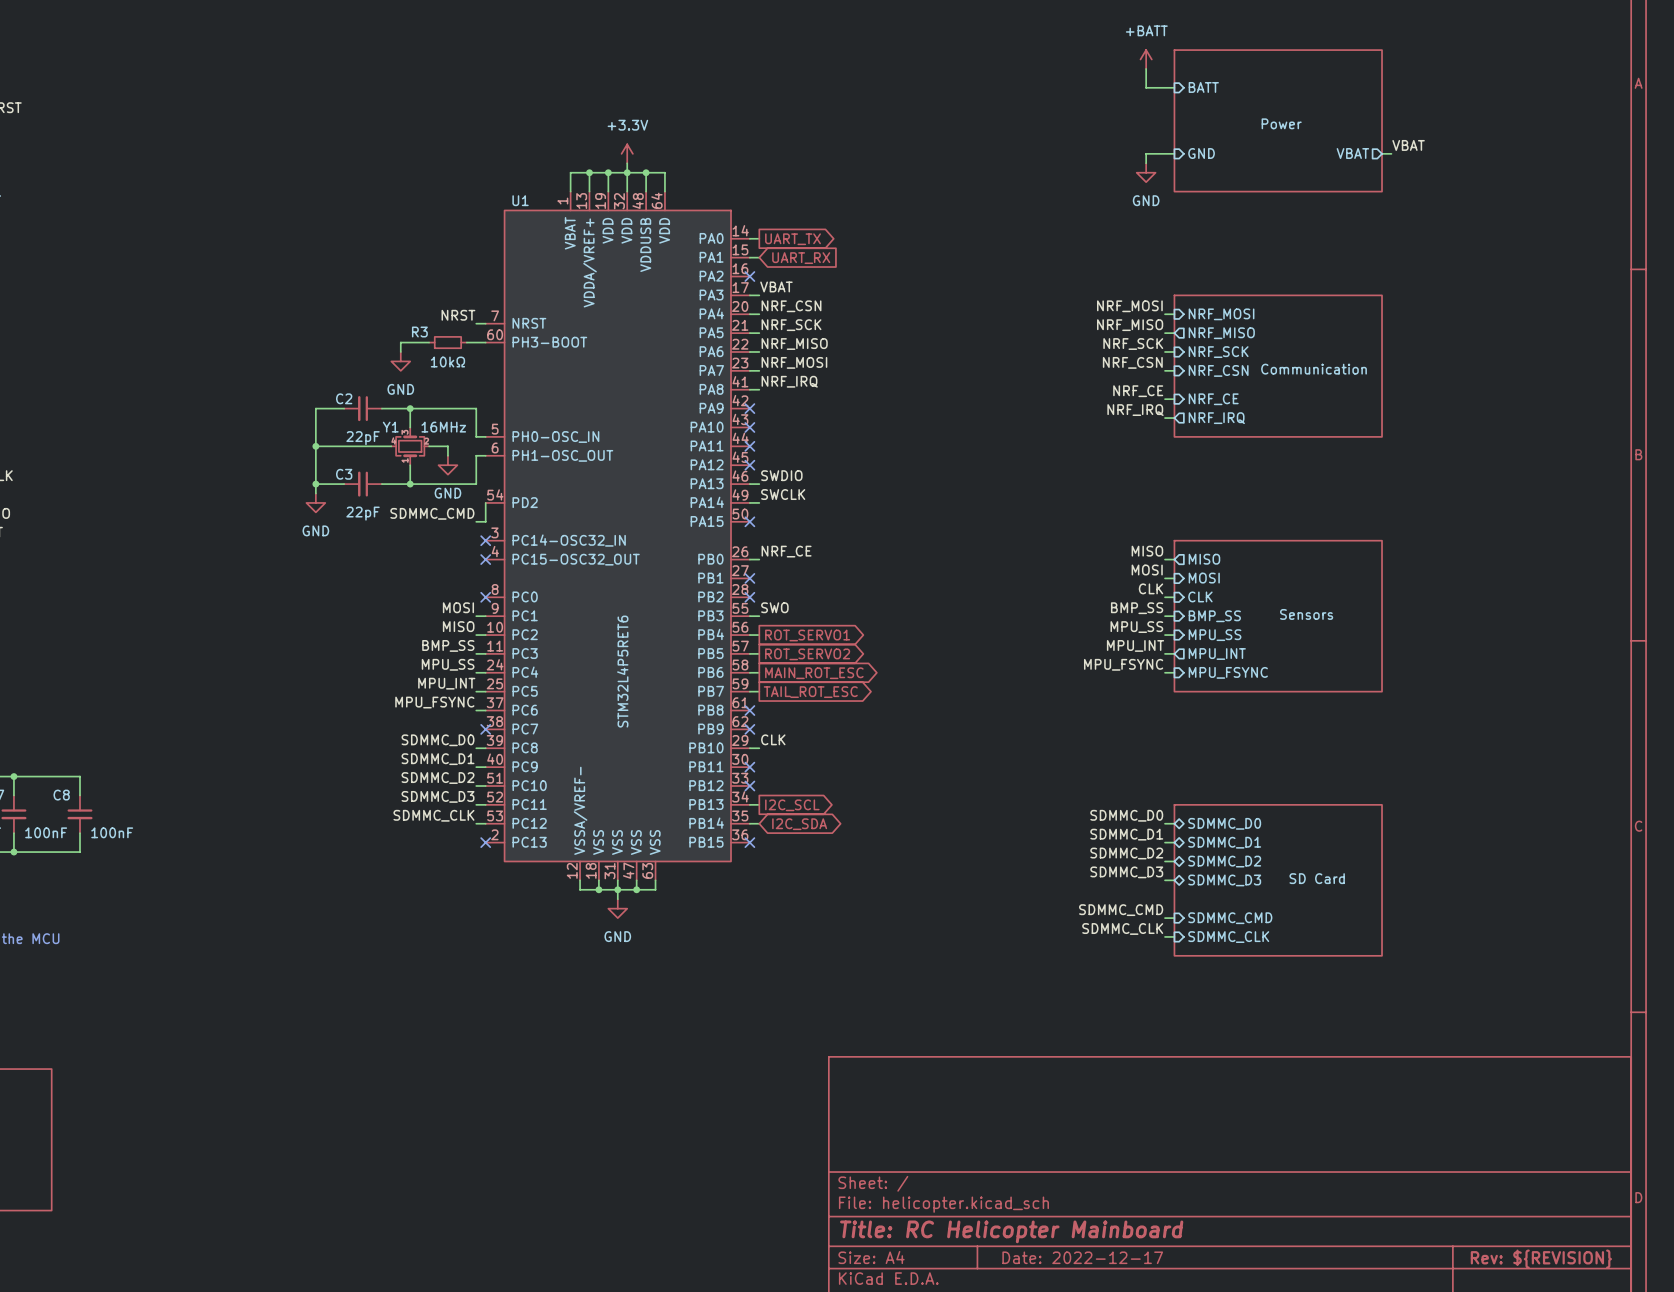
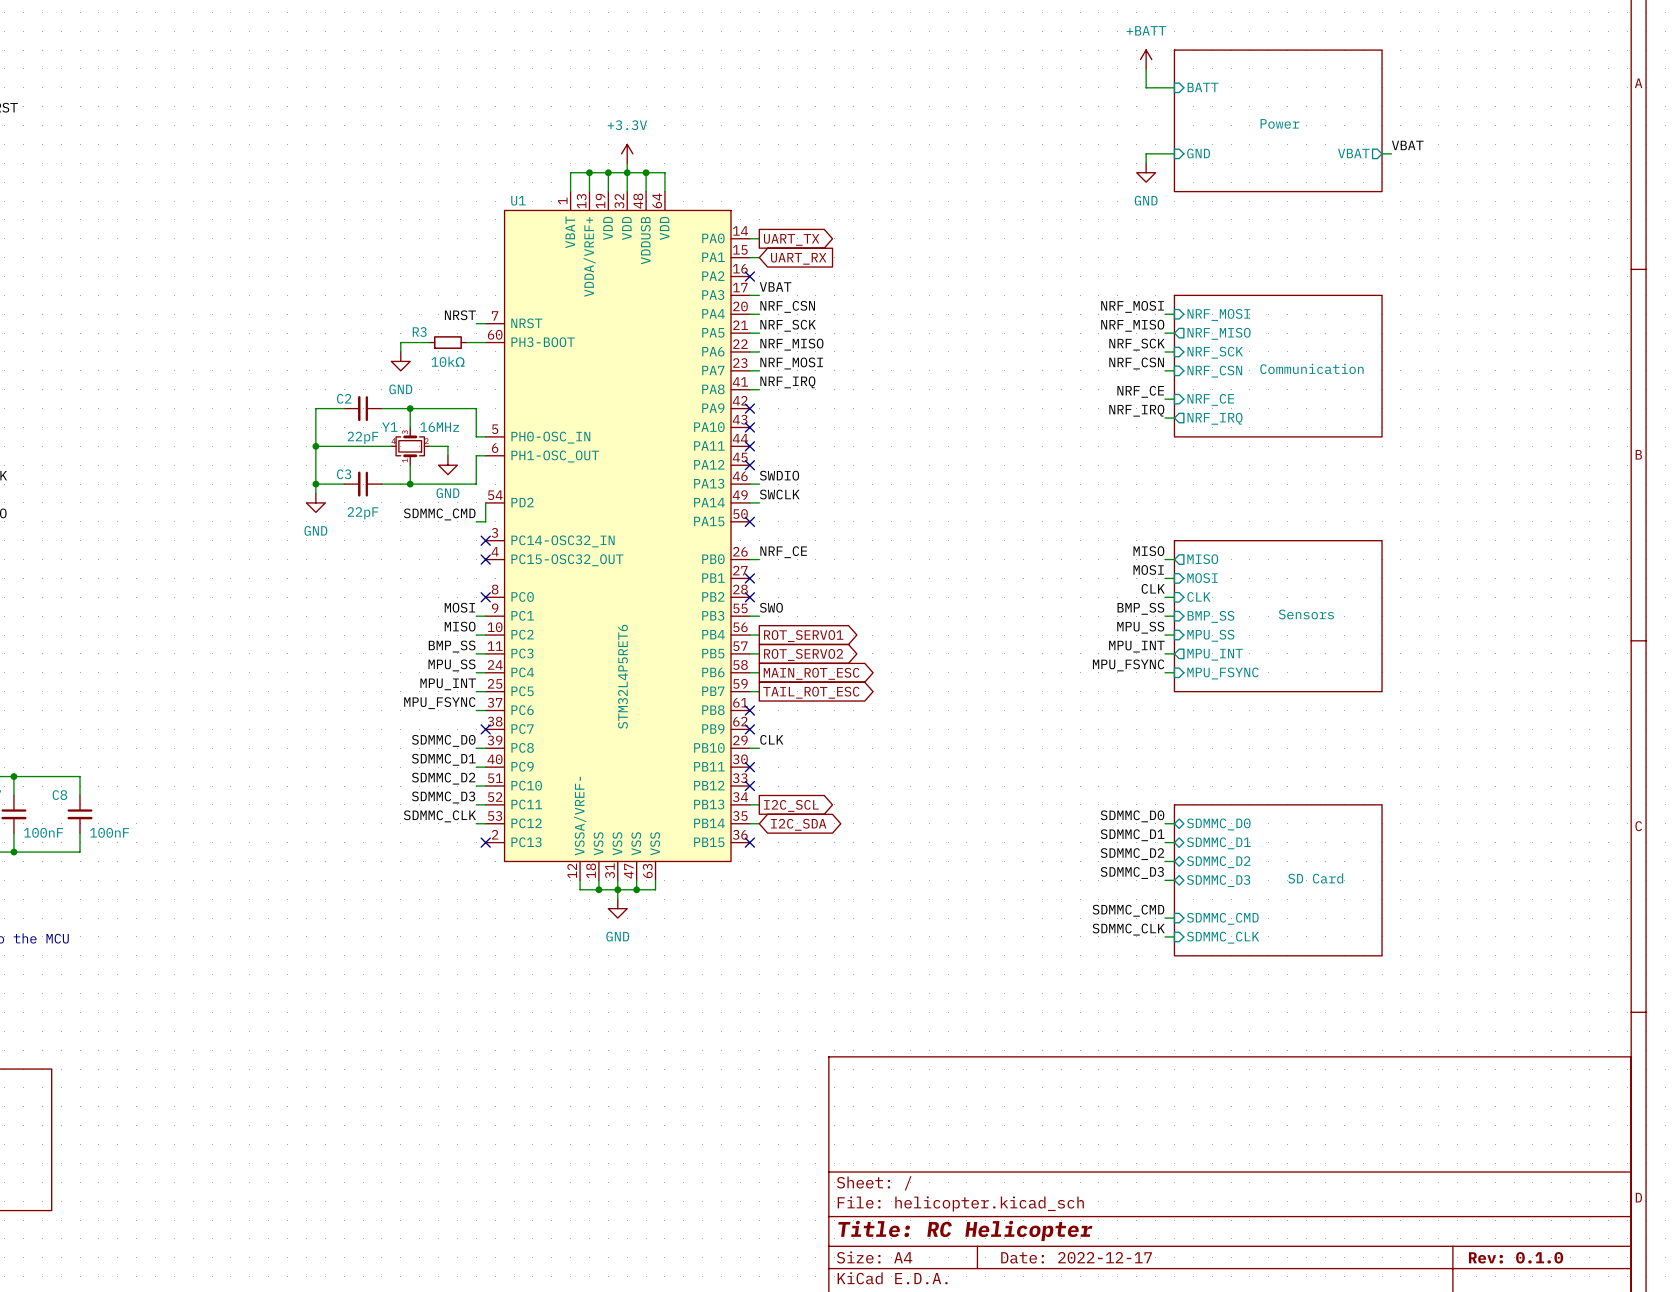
title block: Title: RC Helicopter Mainboard (1011, 1231) -> Title: RC Helicopter (965, 1230)
title block: Rev: ${REVISION} (1541, 1259) -> Rev: 0.1.0 (1516, 1257)

